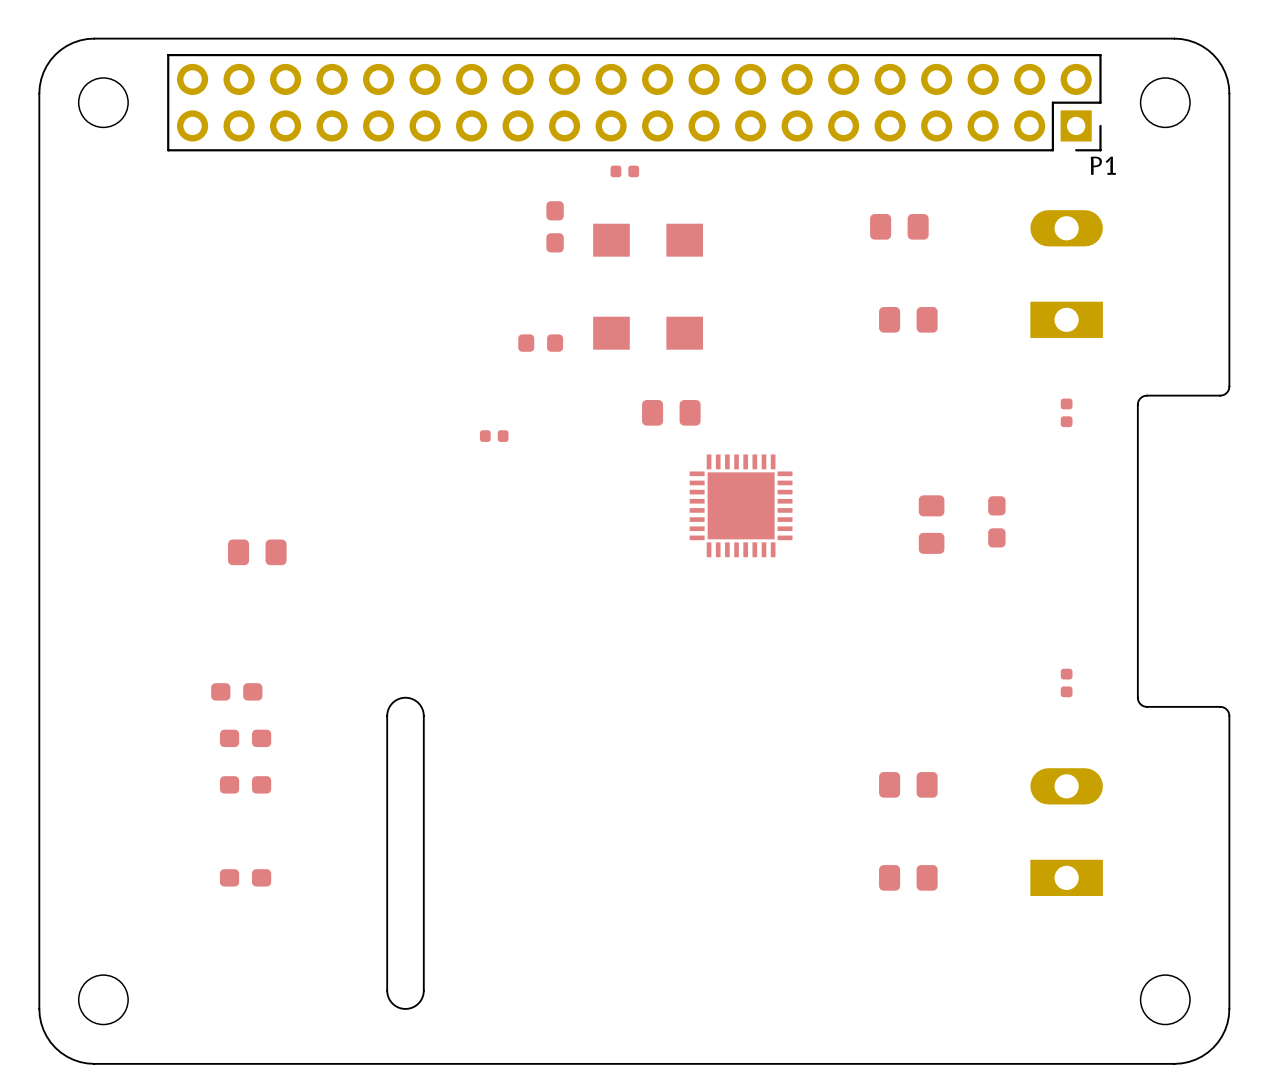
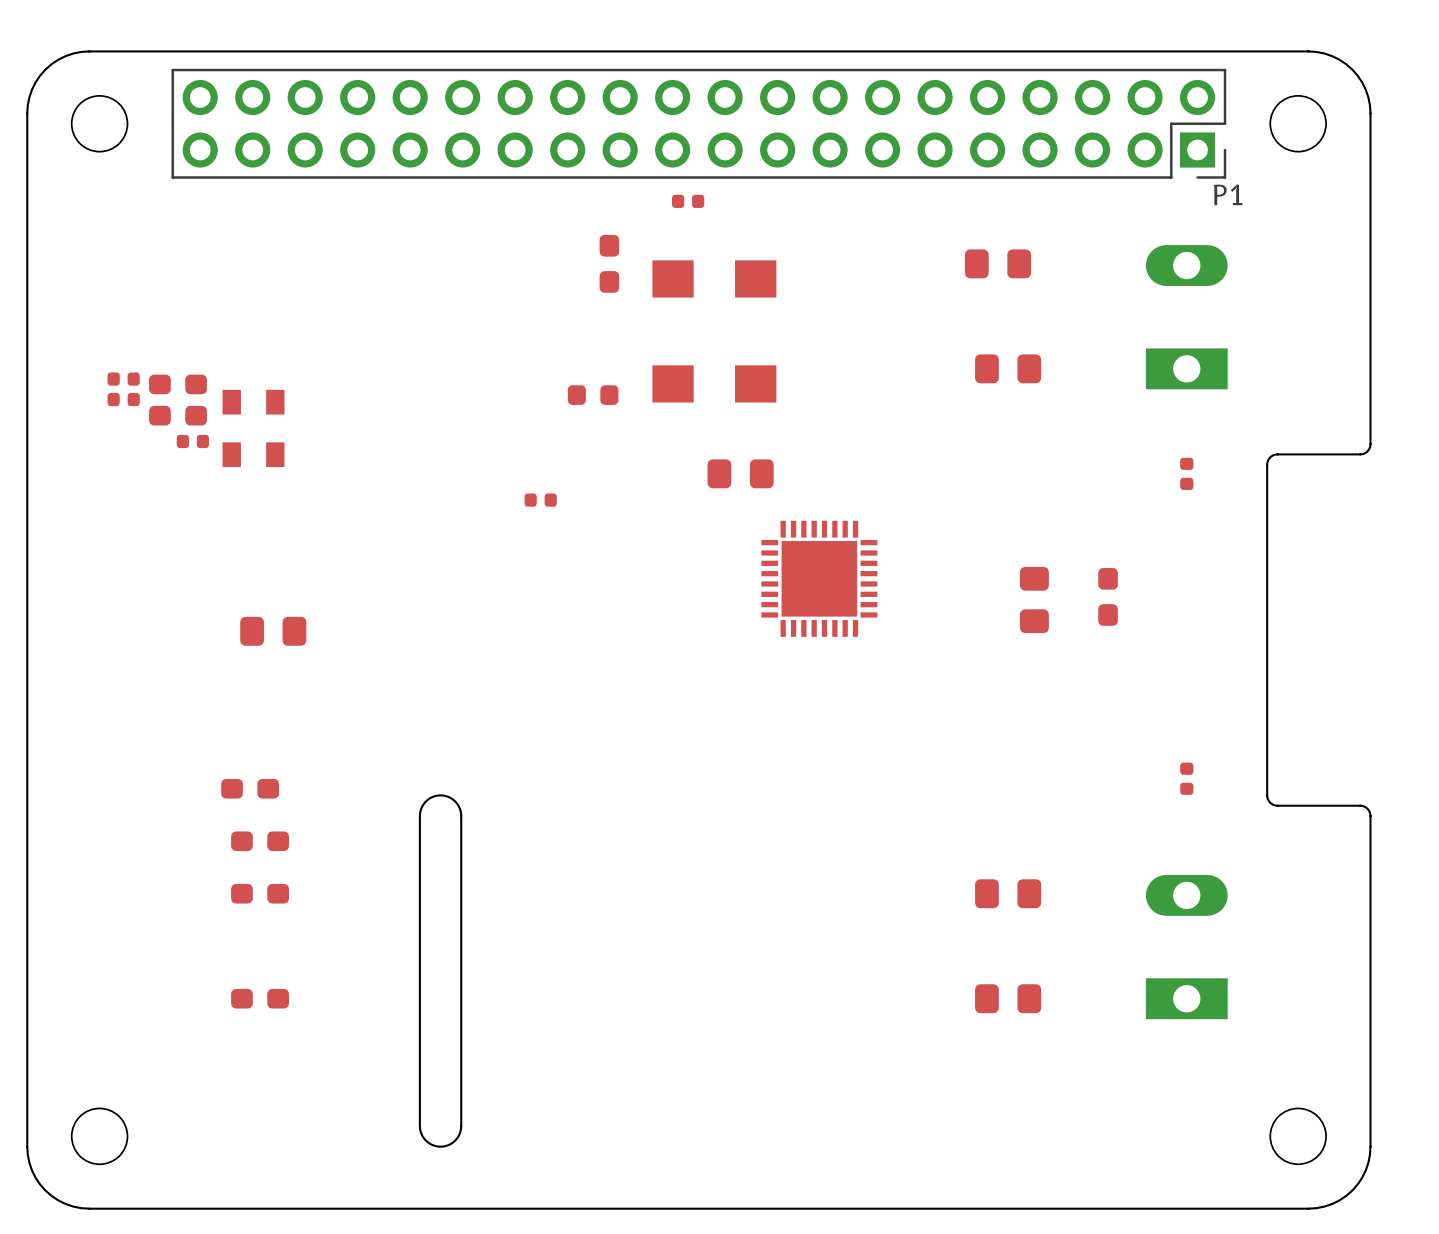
part: none -> (123, 379)
part: none -> (178, 384)
part: none -> (123, 399)
part: none -> (178, 415)
part: none -> (253, 428)
part: none -> (192, 441)

